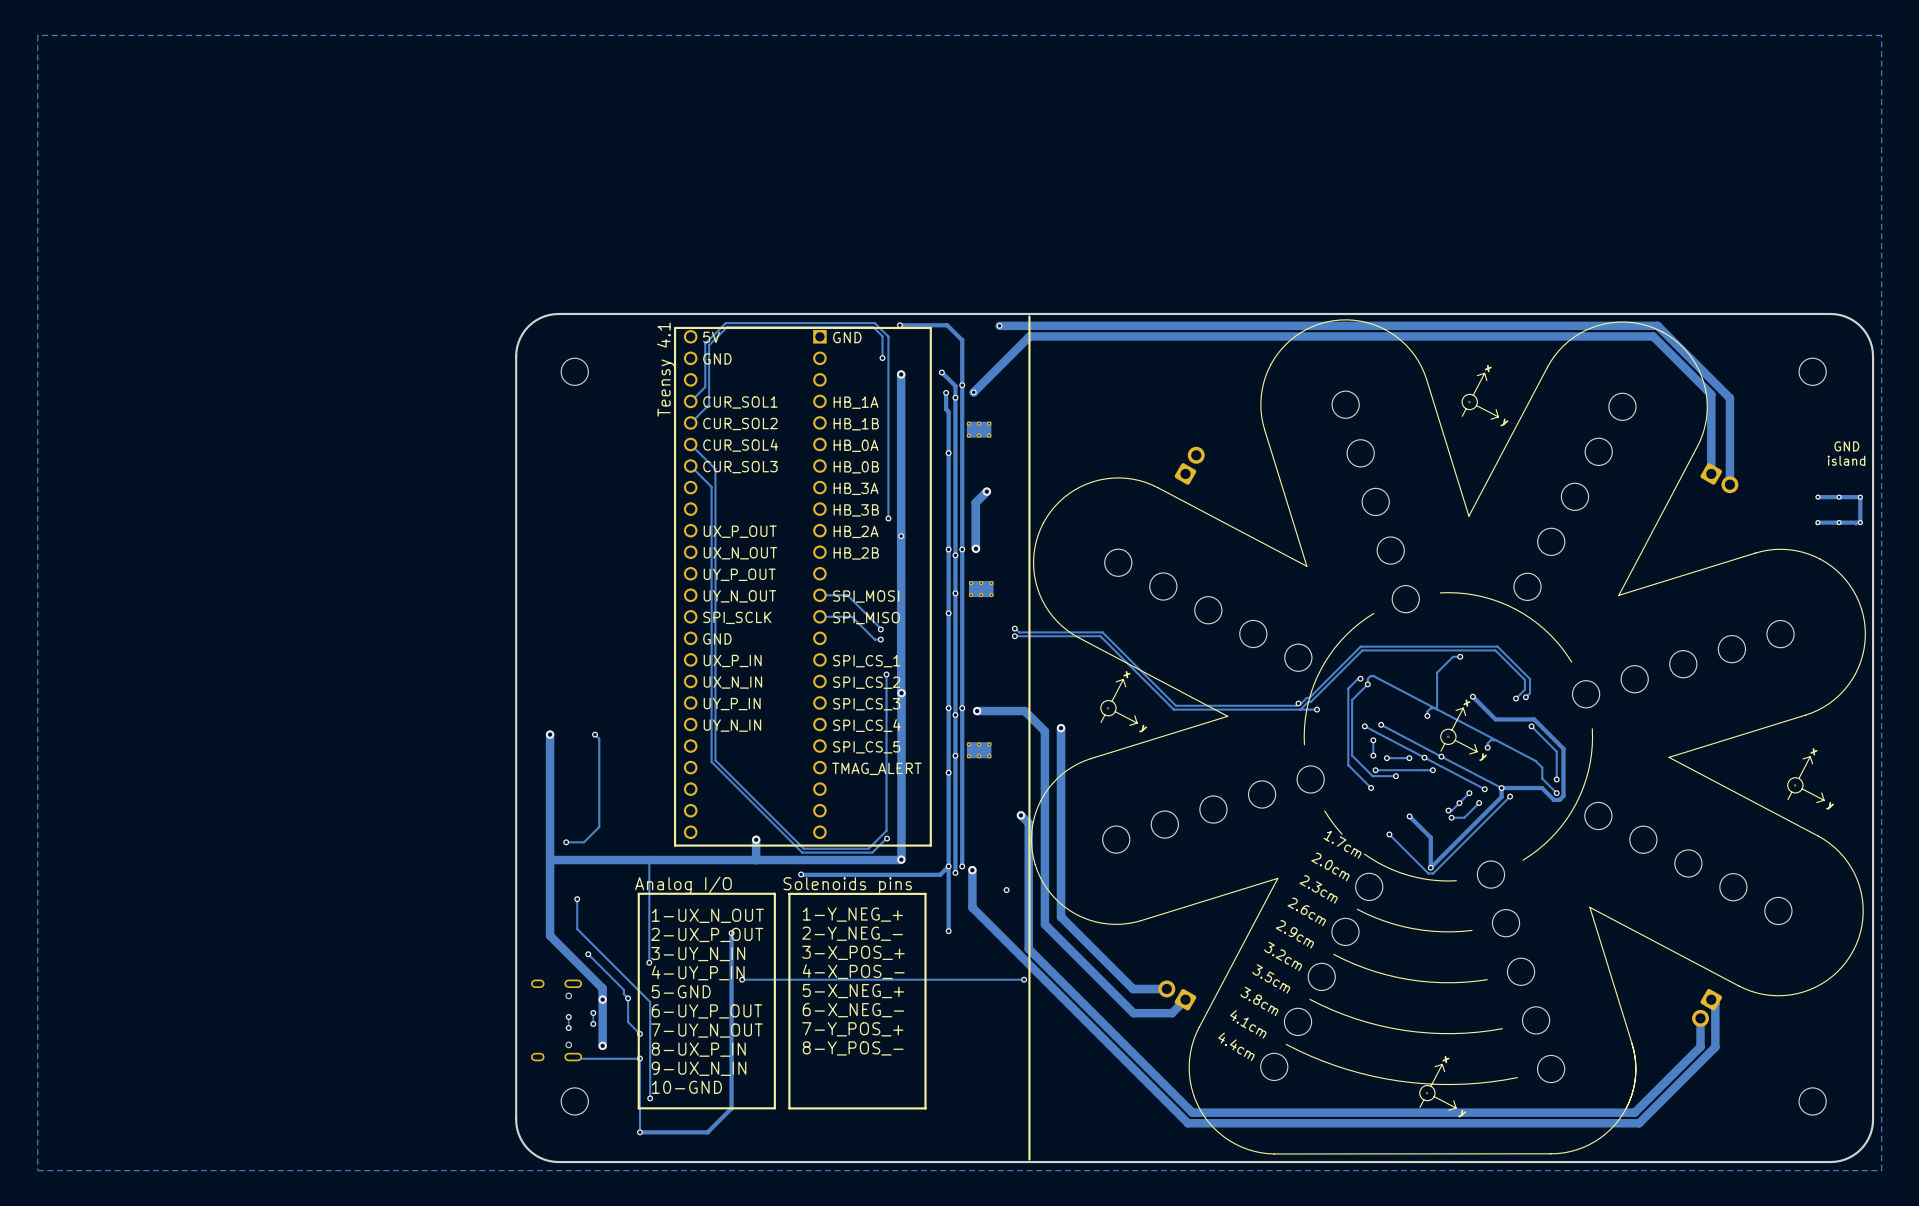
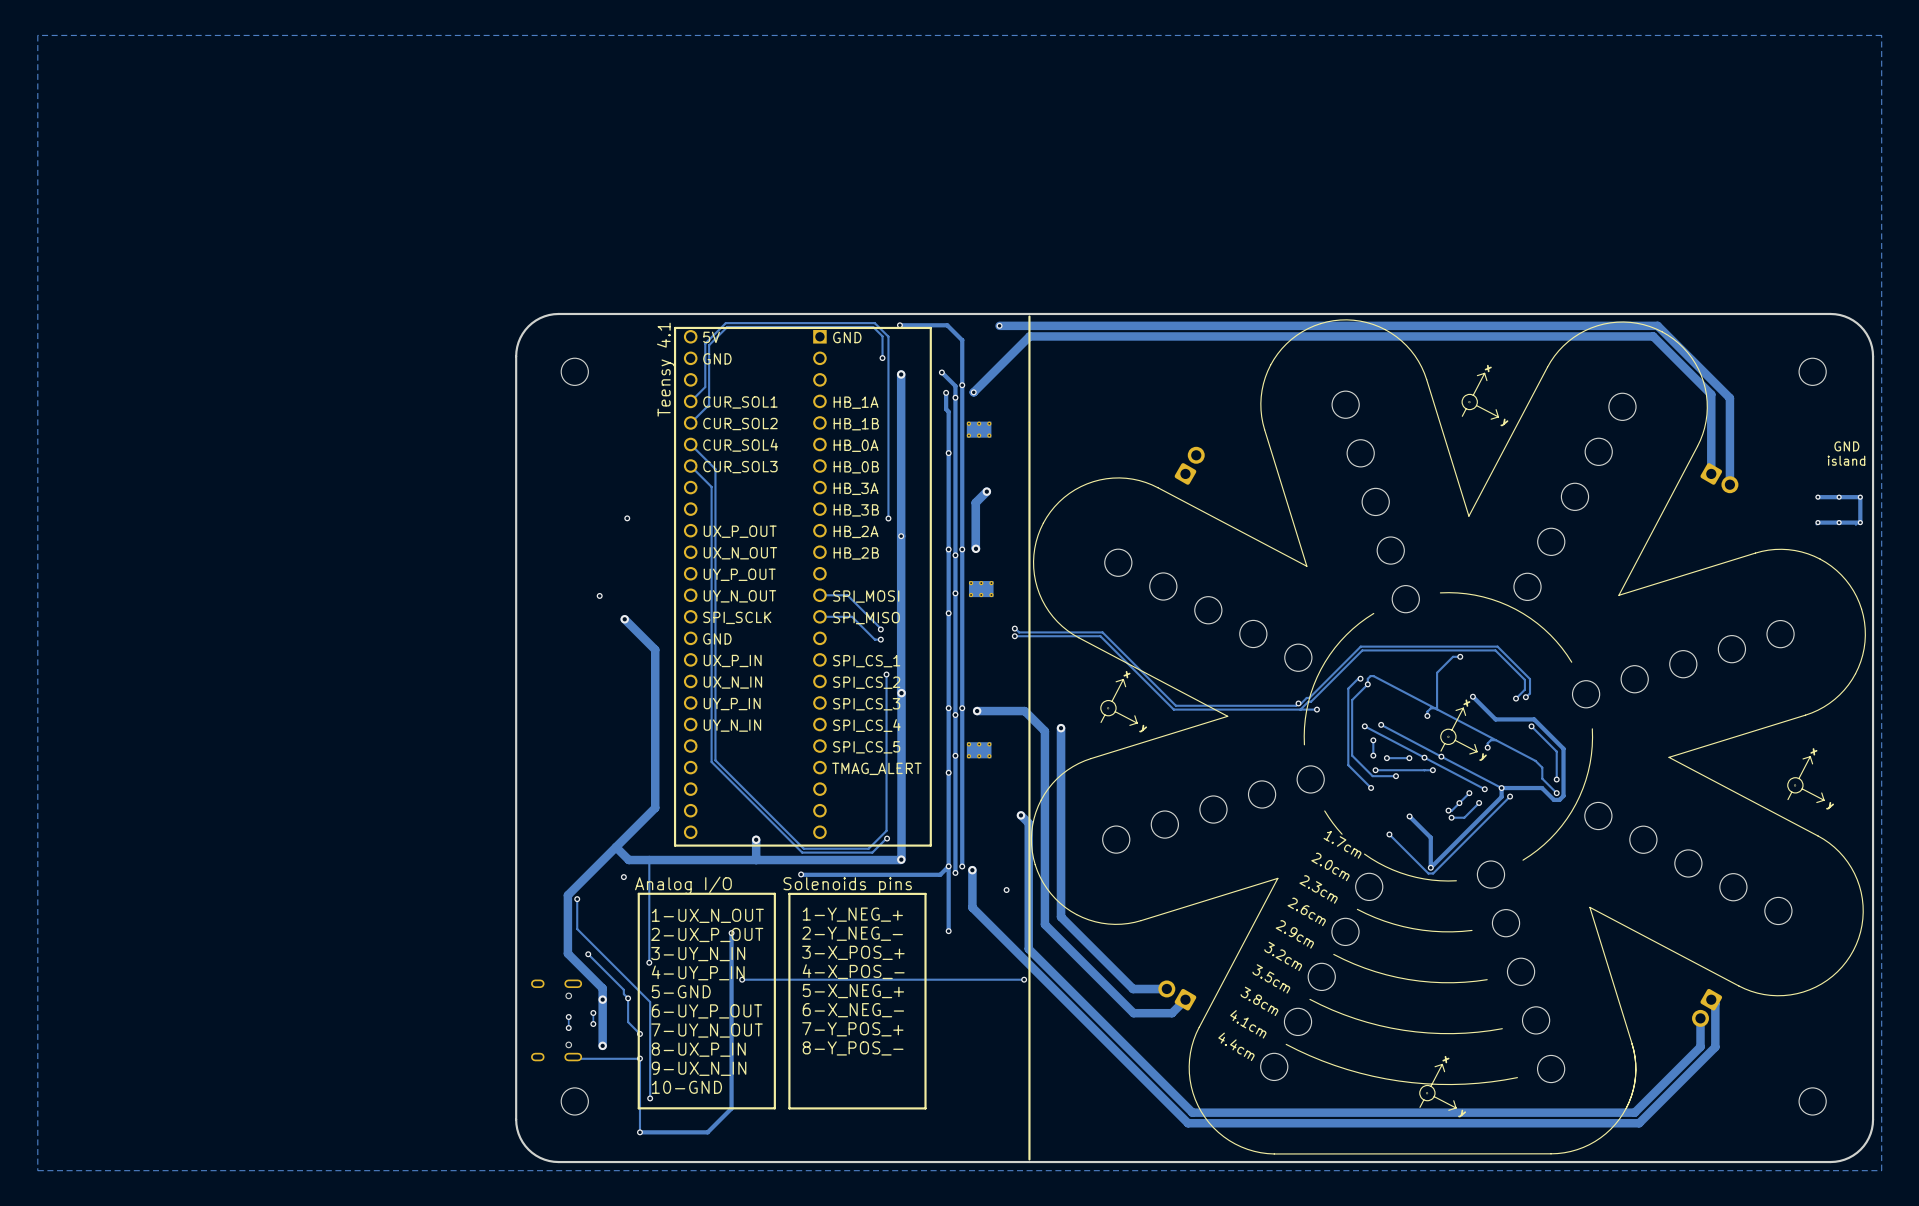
via: none -> (627, 518)
via: none -> (599, 595)
via: none -> (624, 619)
track: (550, 734) (550, 935) (567, 953) -> (624, 619) (655, 649) (655, 807) (567, 895) (567, 953)
via: (550, 734) -> none
track: (595, 734) (599, 738) (599, 827) (584, 842) (566, 842) -> none
via: (595, 734) -> none
via: (566, 842) -> none
track: (628, 860) (550, 860) -> (628, 860) (615, 847)
via: none -> (623, 877)

